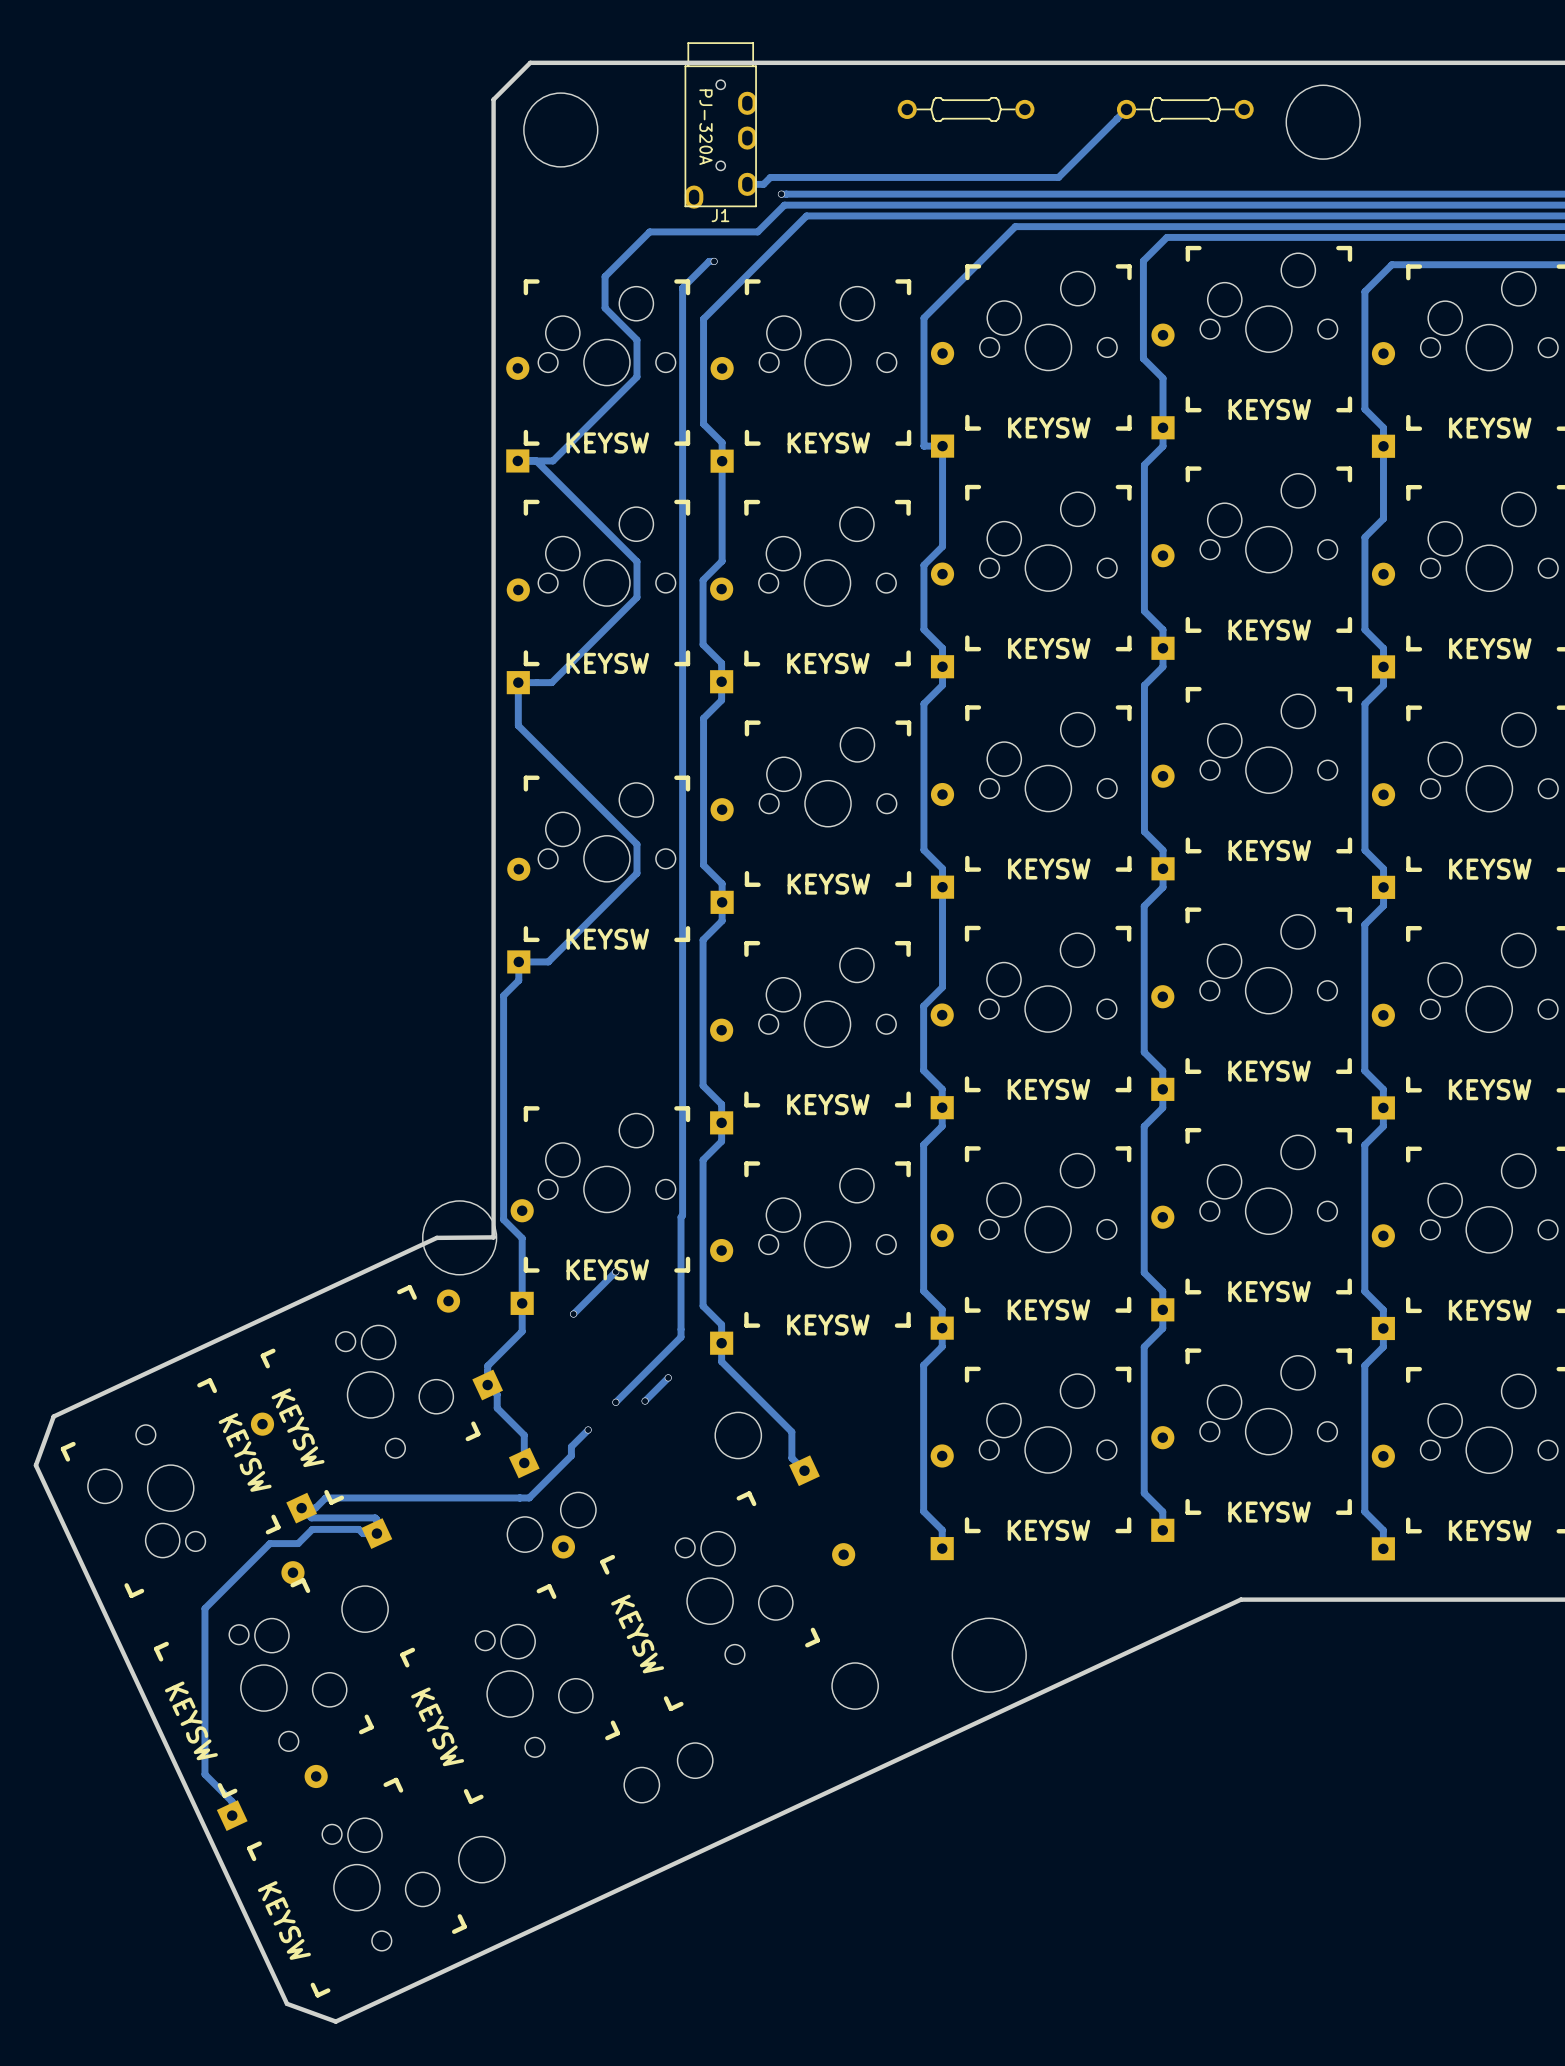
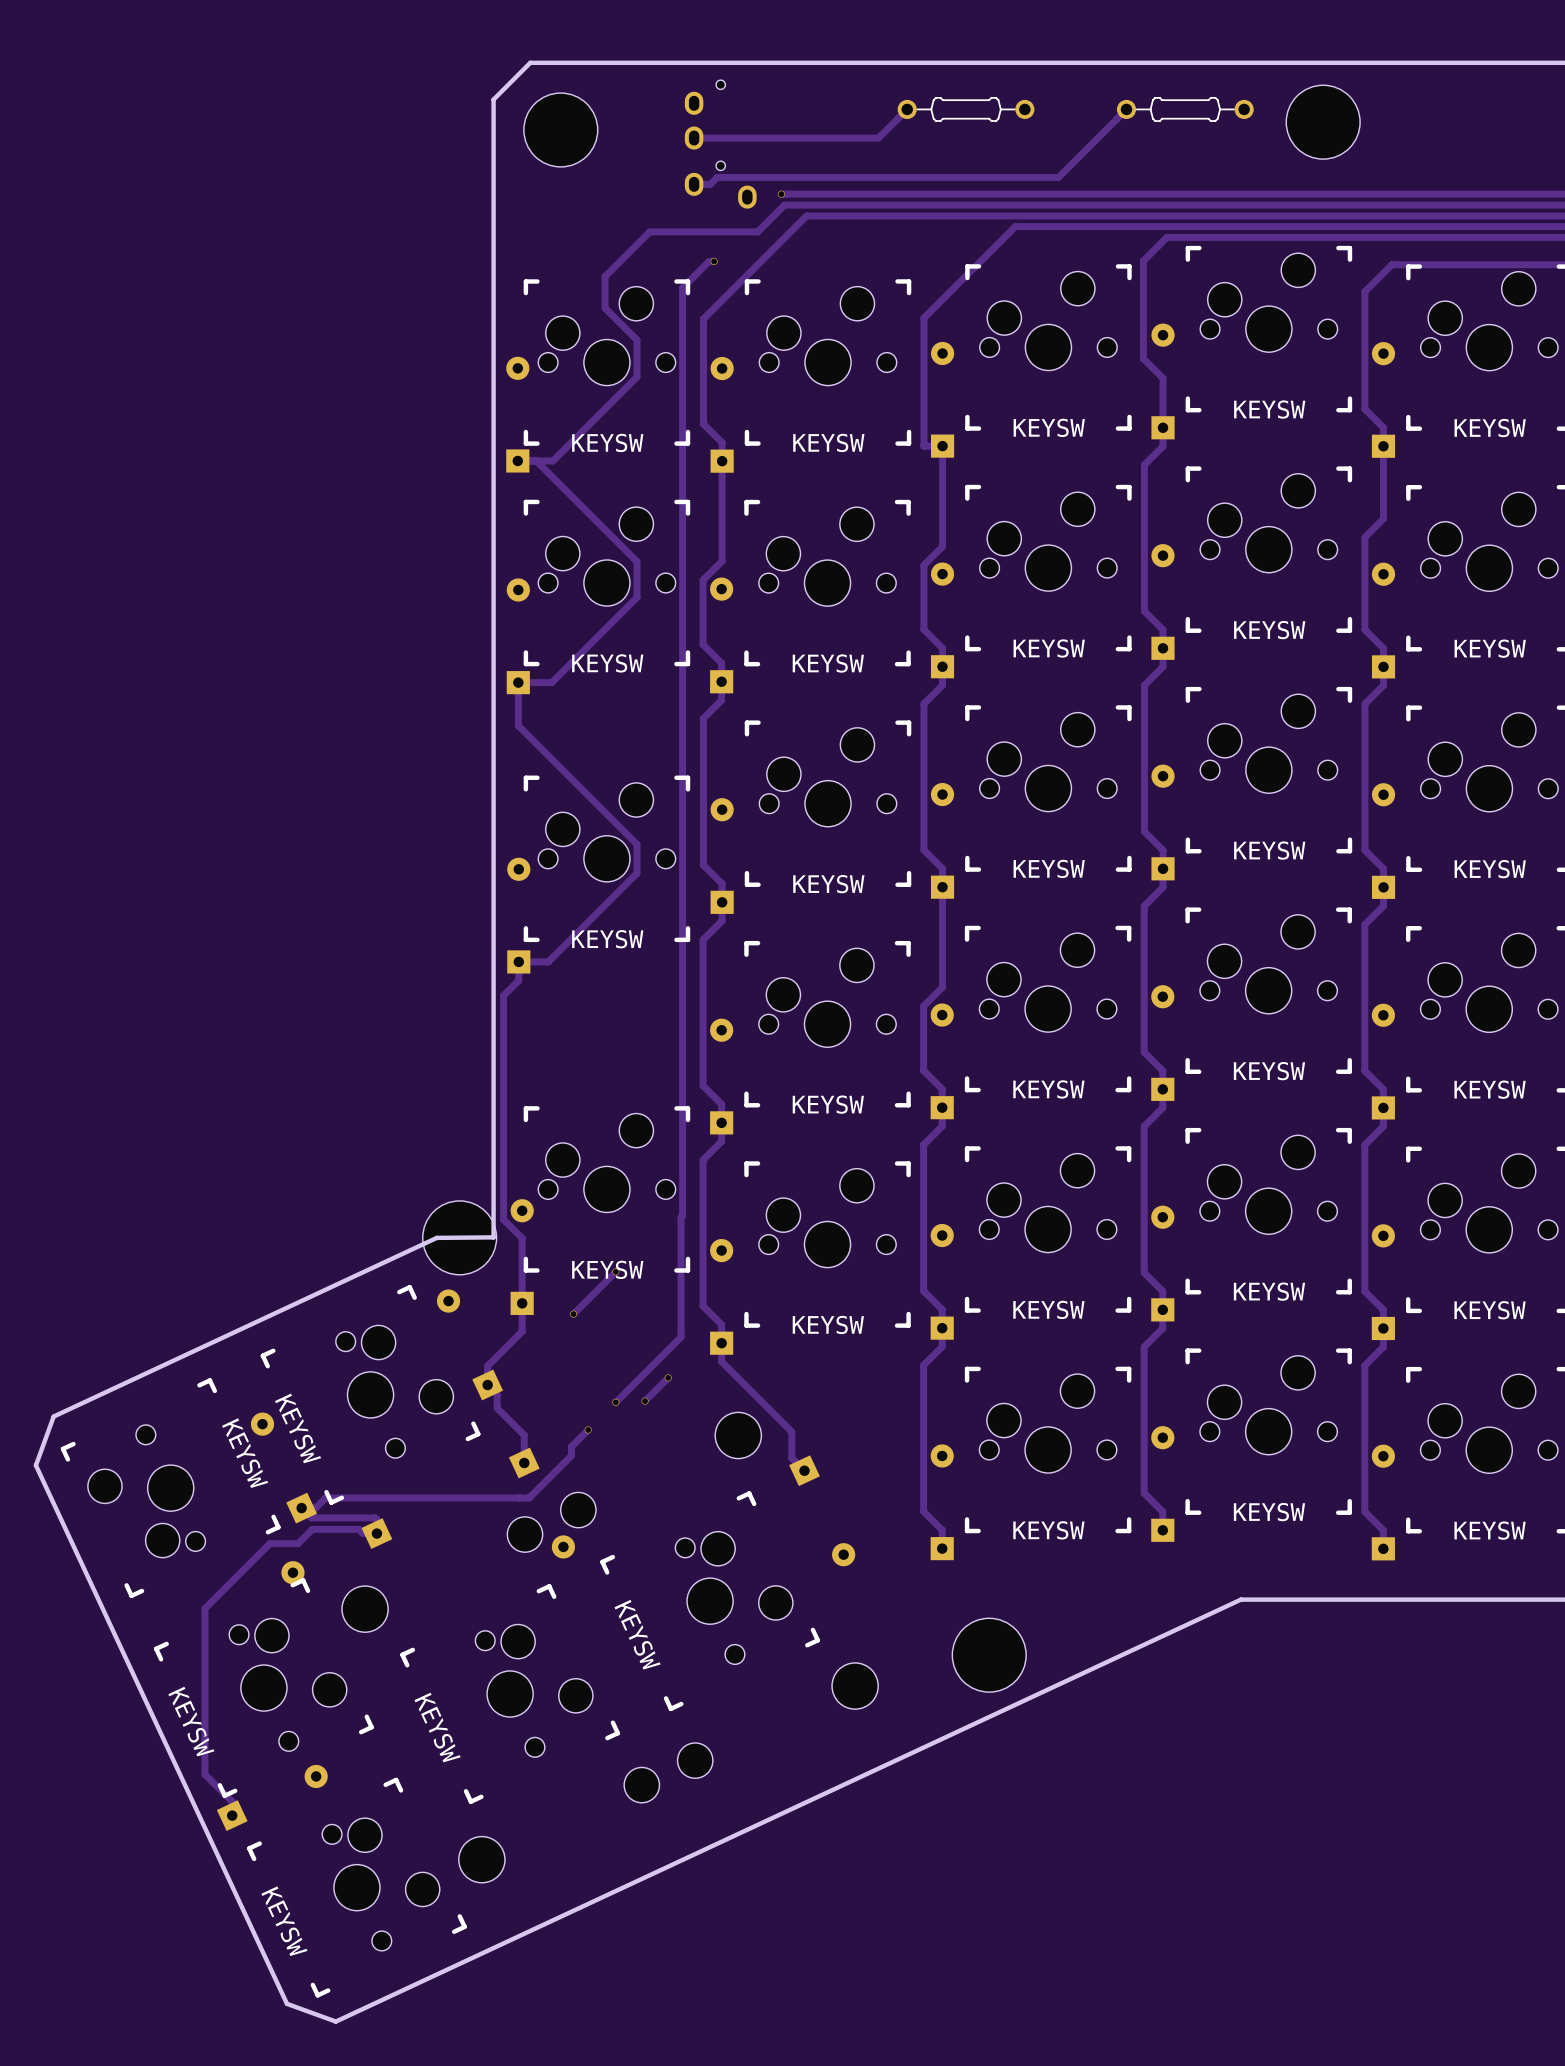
track: none -> (907, 109) (878, 138) (694, 138)
J1 side: bottom (720, 125) -> top (720, 144)
track: (770, 177) (763, 184) (747, 184) -> (770, 177) (717, 177) (710, 184) (694, 184)

